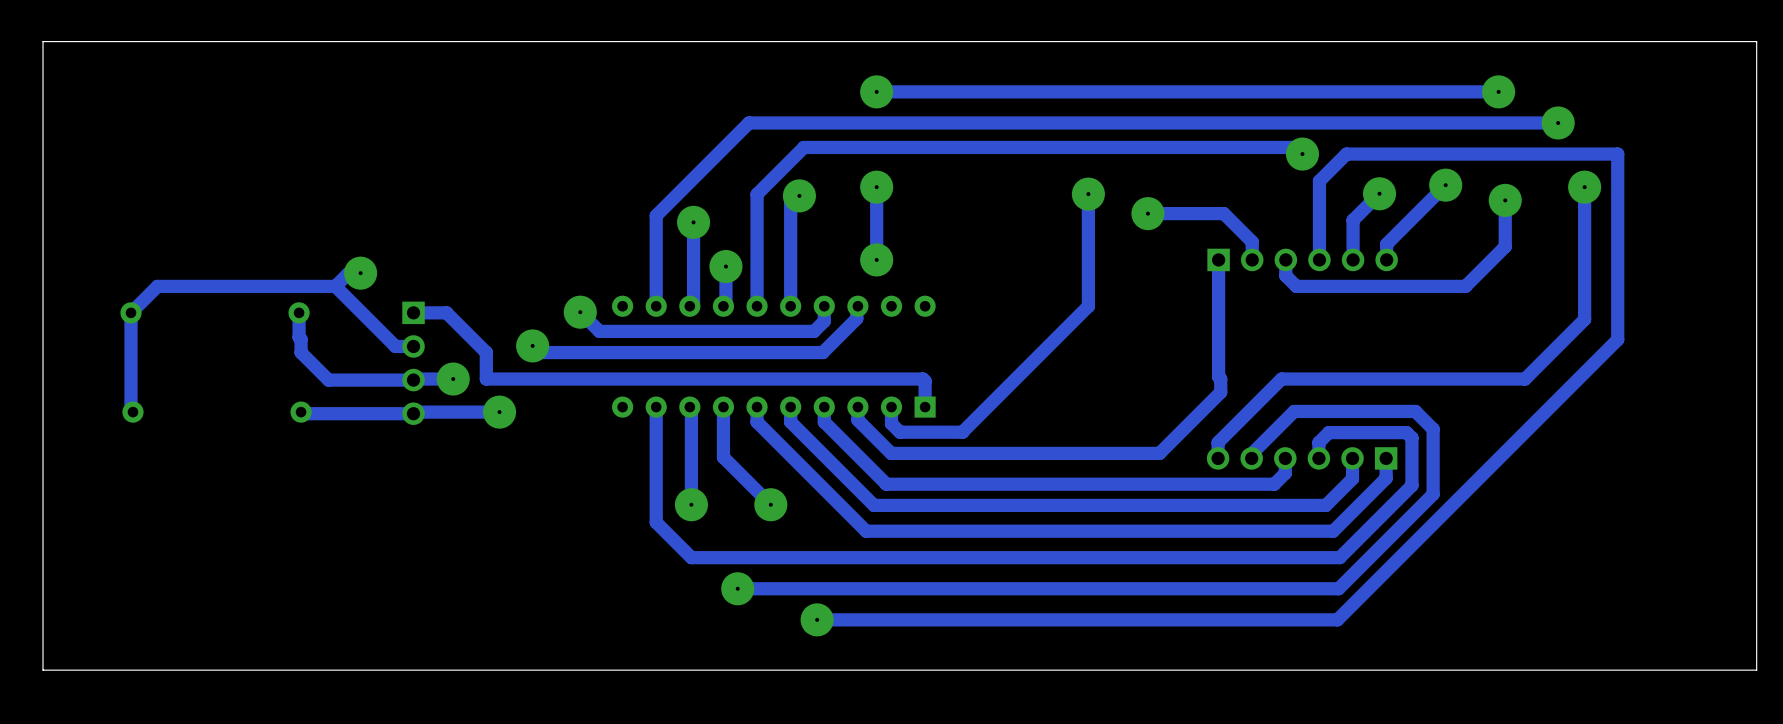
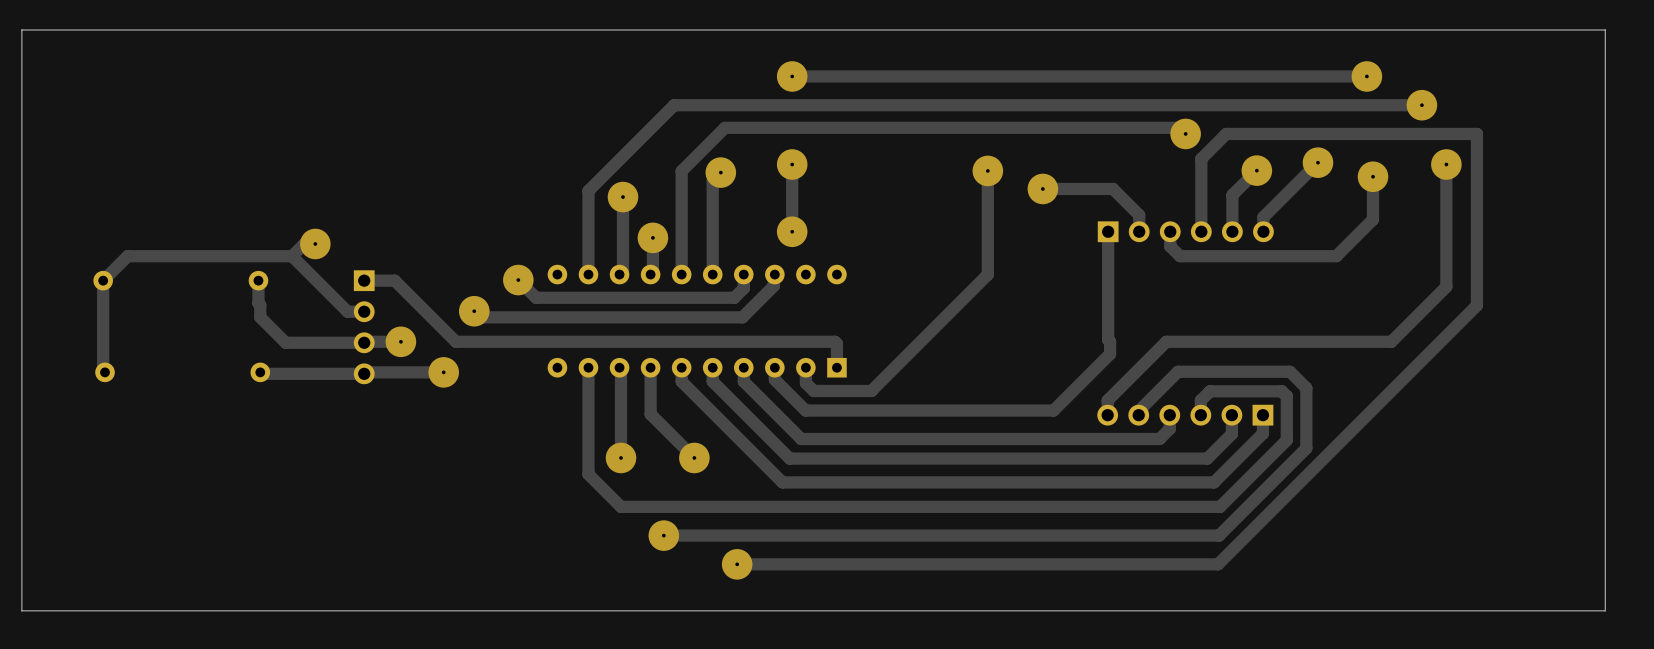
track: (486, 352) (486, 379) (512, 379) -> (431, 317) (455, 341)

